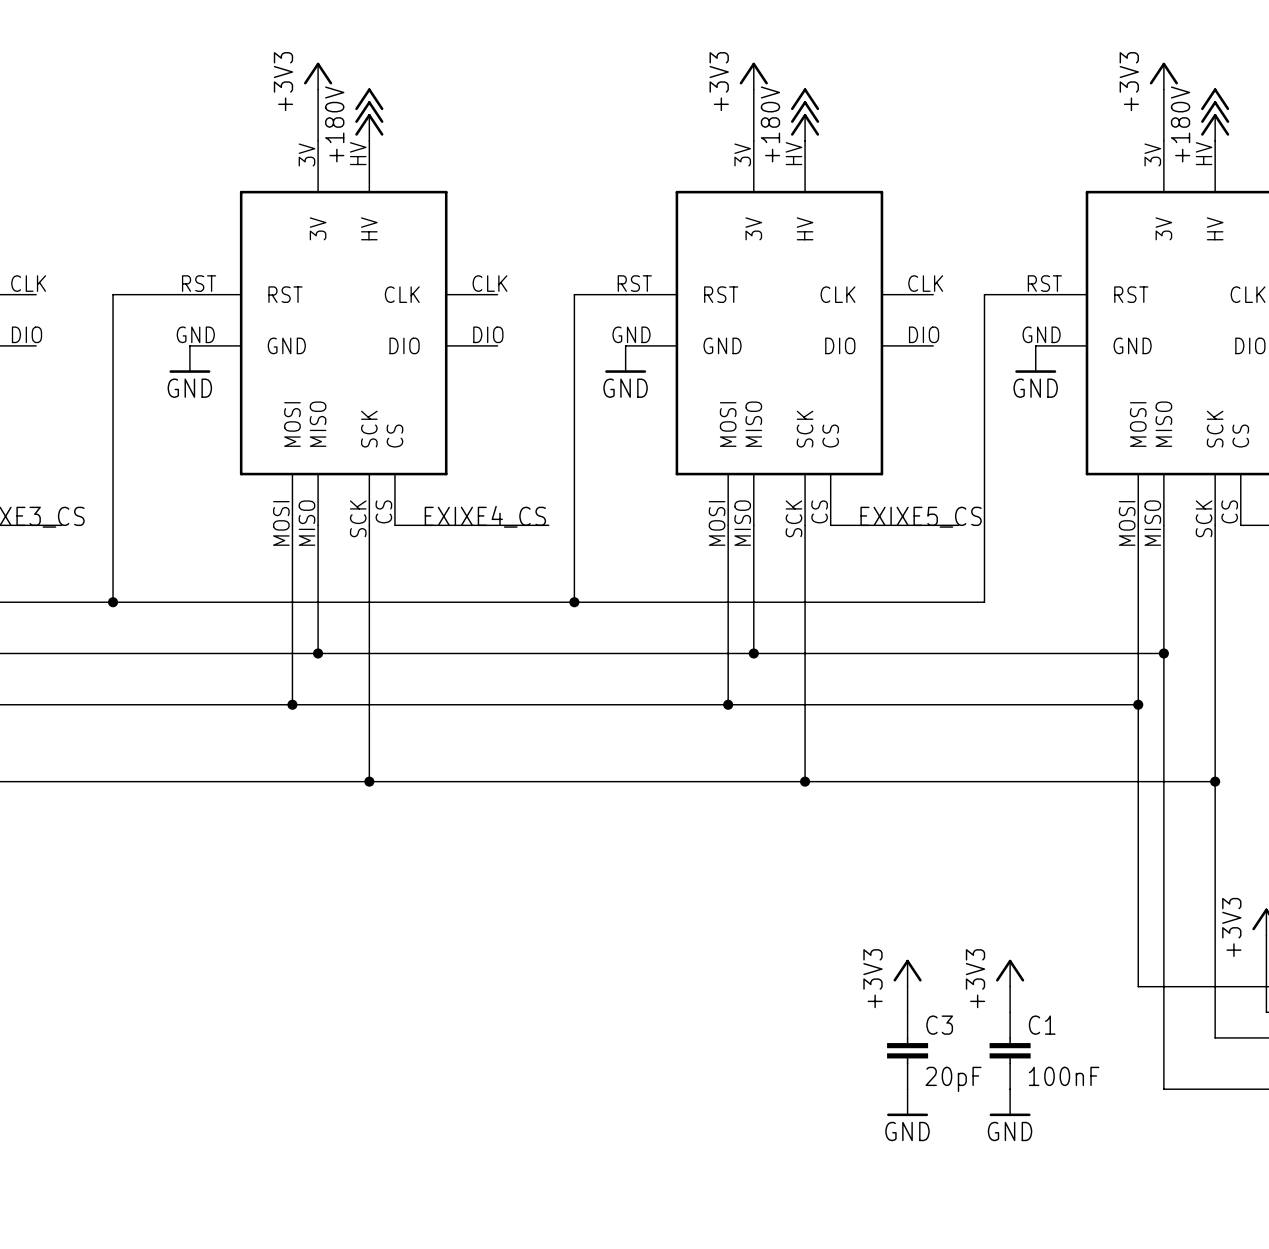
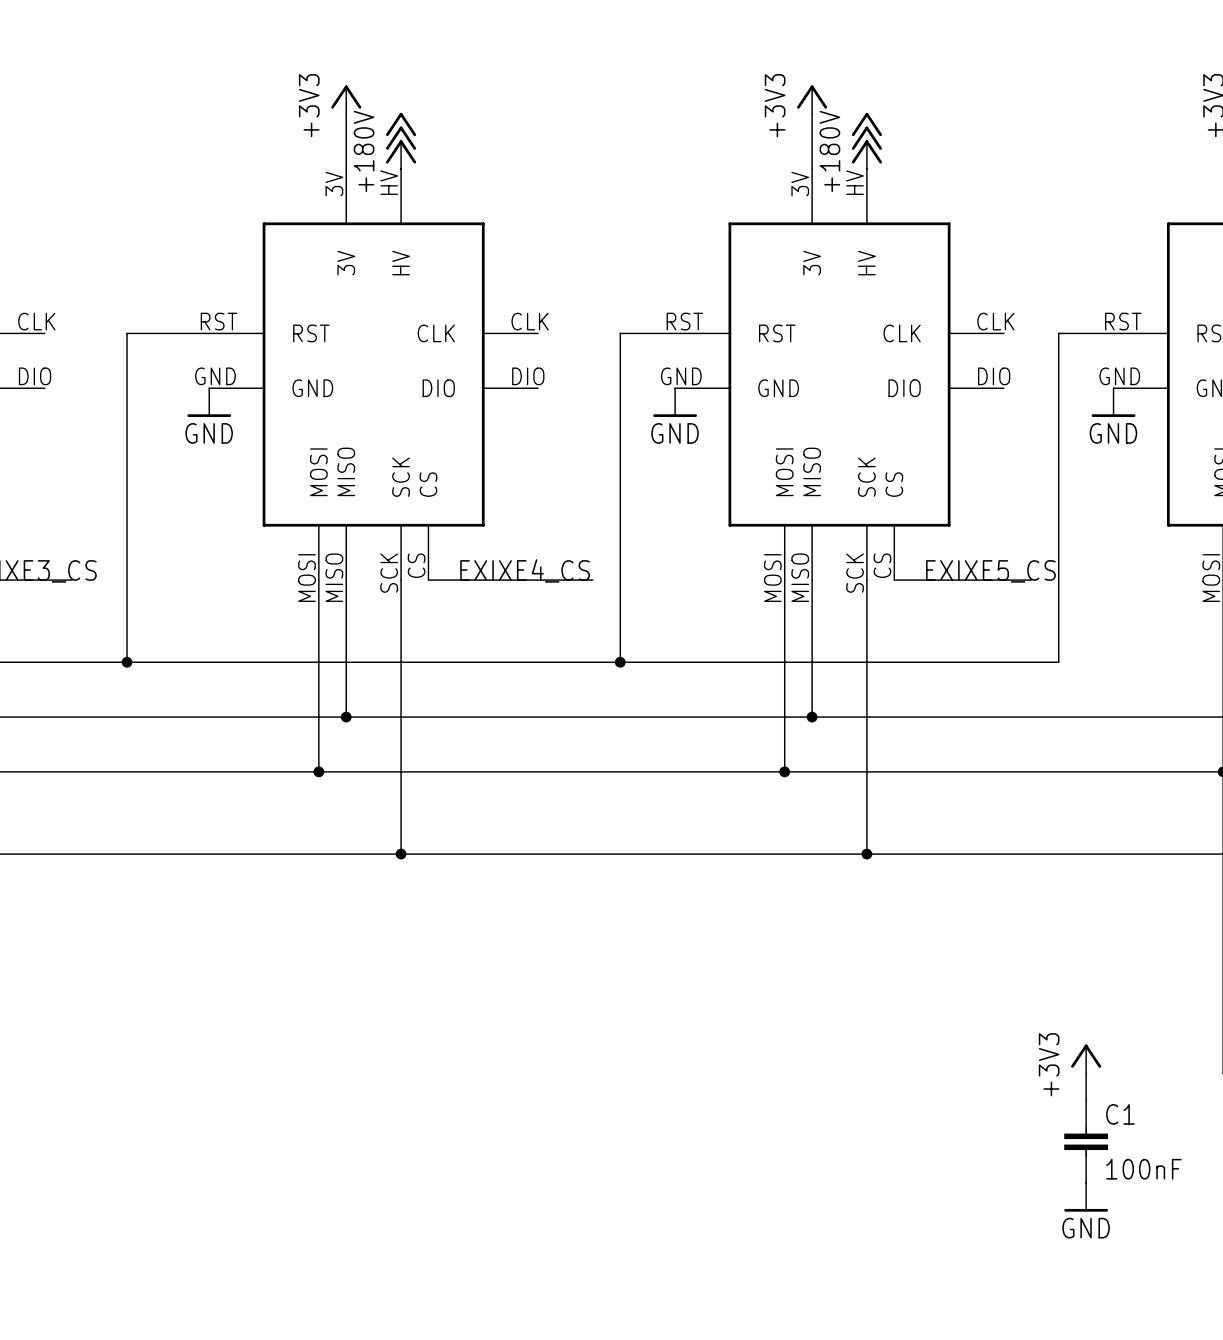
power symbol: +3V3 (907, 973) -> none
wire: (907, 986) (907, 1012) -> none
C3: 20pF (907, 1050) -> none
power symbol: GND (907, 1102) -> none

